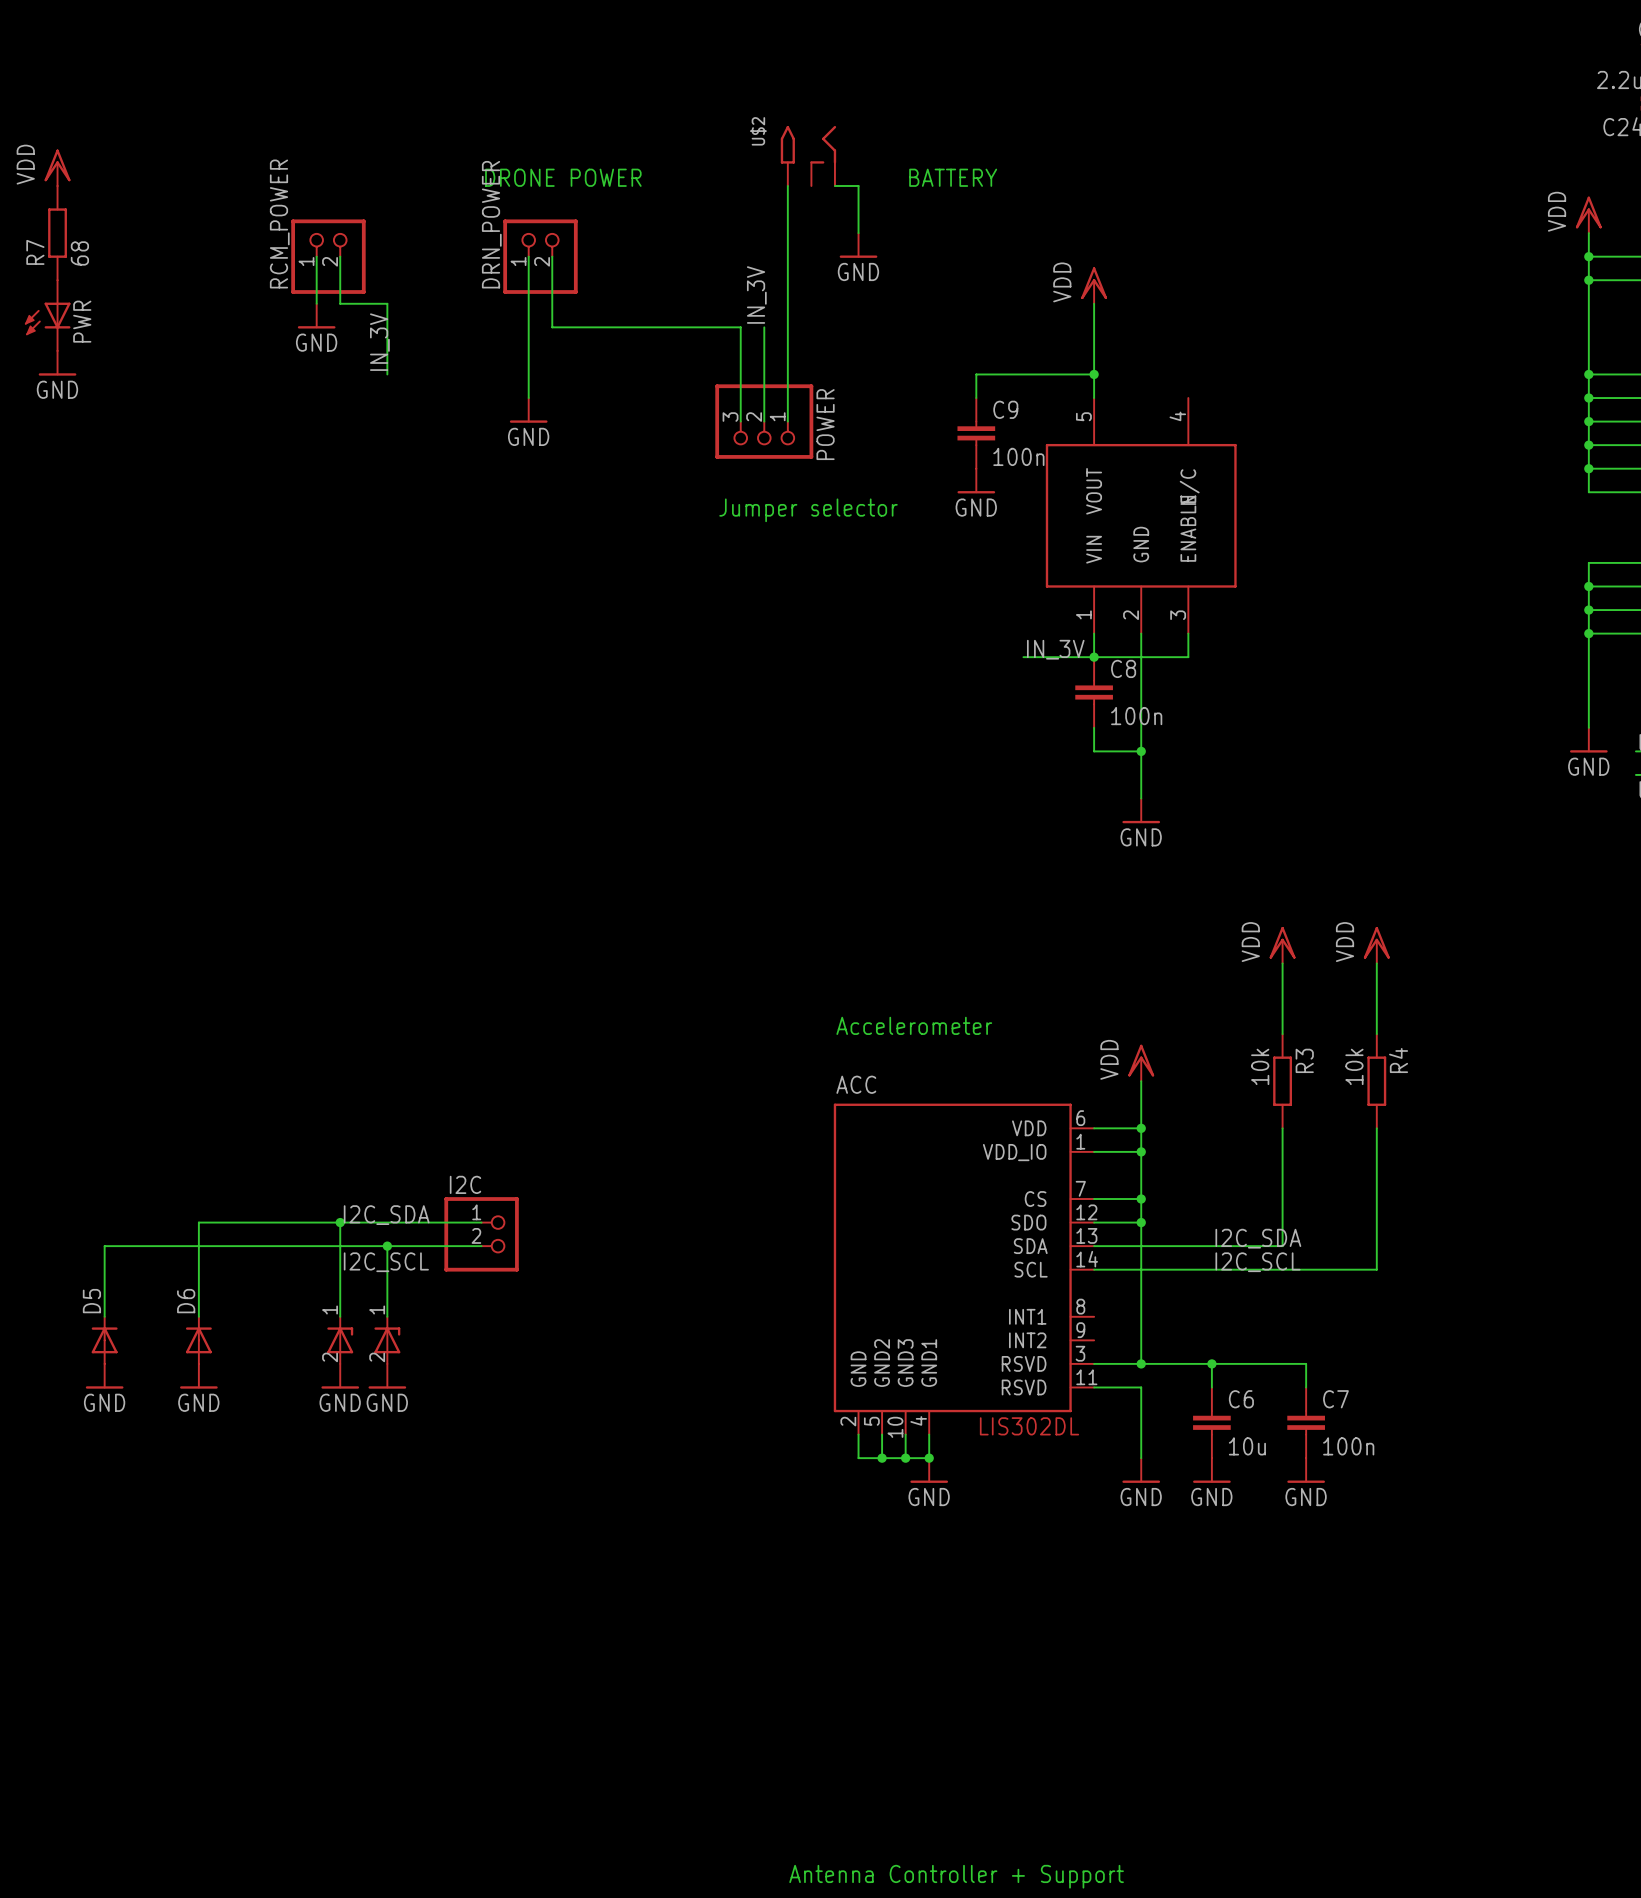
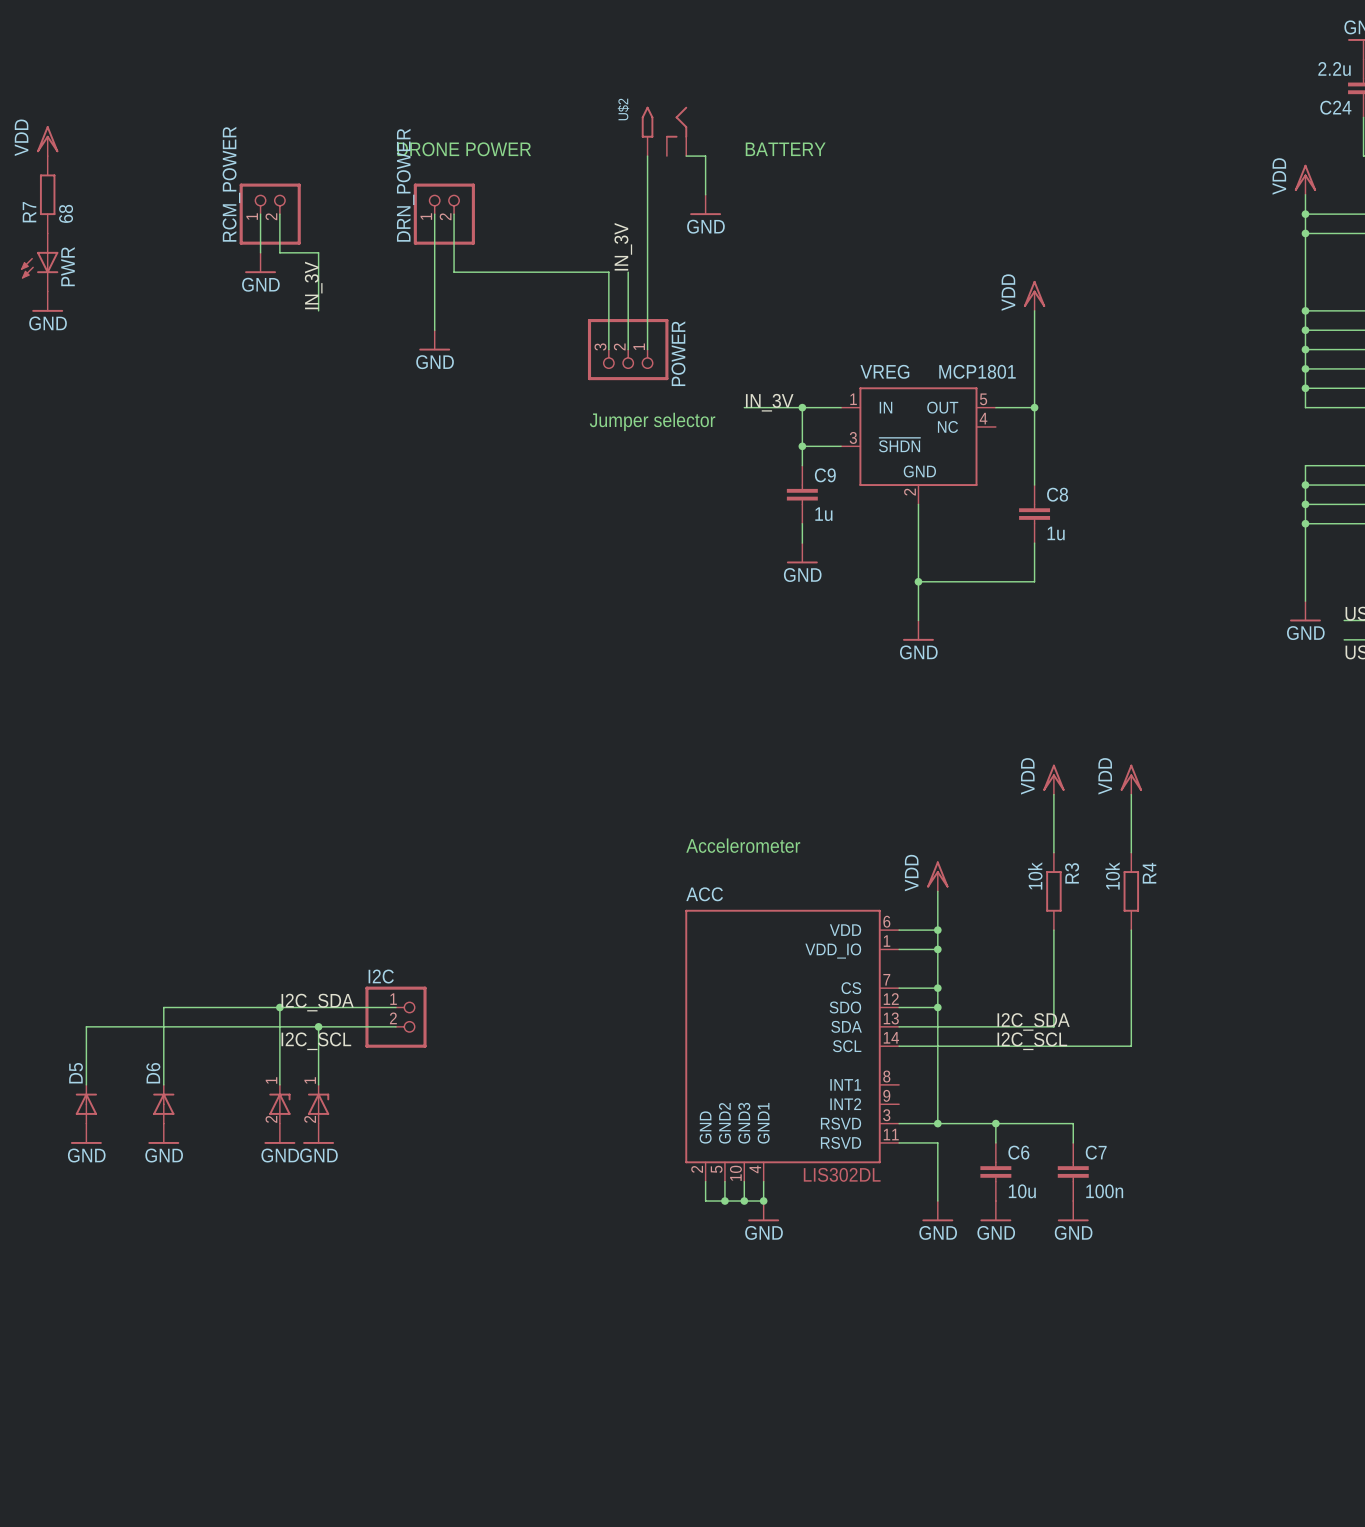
power symbol position: VDD (1094, 285) -> VDD (1034, 295)
wire: (1094, 303) (1094, 398) -> none
wire: (1094, 374) (976, 374) (976, 398) -> none
junction: (1094, 374) -> none
wire: none -> (1034, 310) (1034, 485)
C9 position: (976, 433) -> (802, 494)
C9 value: 100n (1018, 456) -> 1u (823, 514)
power symbol: GND (976, 481) -> none
wire: none -> (744, 407) (841, 407)
wire: none -> (802, 407) (802, 465)
junction: none -> (802, 407)
wire: none -> (995, 407) (1034, 407)
junction: none -> (1034, 407)
part: (1141, 515) -> none
VREG: none -> MCP1801 (918, 445)
wire: none -> (802, 446) (841, 446)
junction: none -> (802, 446)
wire: none -> (918, 504) (918, 620)
wire: (1094, 633) (1094, 657) -> (802, 523) (802, 543)
wire: (1141, 633) (1141, 798) -> none
wire: (1188, 633) (1188, 657) (1023, 657) -> none
label position: IN_3V (1055, 649) -> IN_3V (769, 402)
junction: (1094, 657) -> none
wire: none -> (1034, 543) (1034, 581) (918, 581)
power symbol: none -> GND (802, 553)
C8 position: (1094, 692) -> (1034, 514)
junction: none -> (918, 581)
C8 value: 100n (1136, 716) -> 1u (1056, 533)
wire: (1094, 727) (1094, 751) (1141, 751) -> none
junction: (1141, 751) -> none
power symbol position: GND (1141, 810) -> GND (918, 630)

